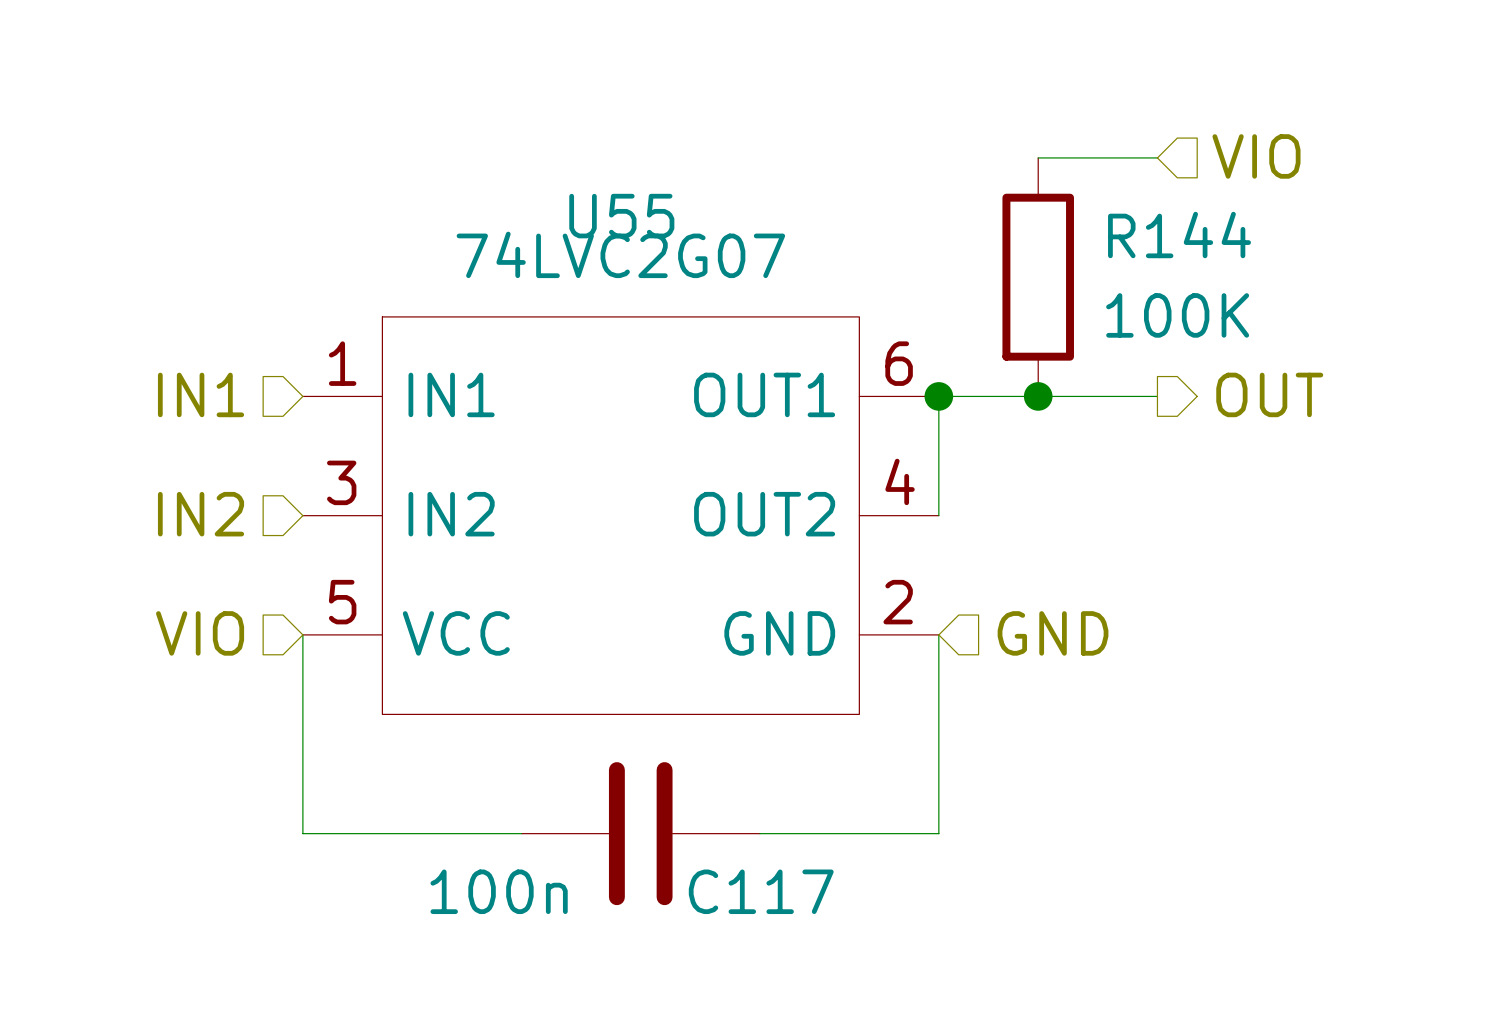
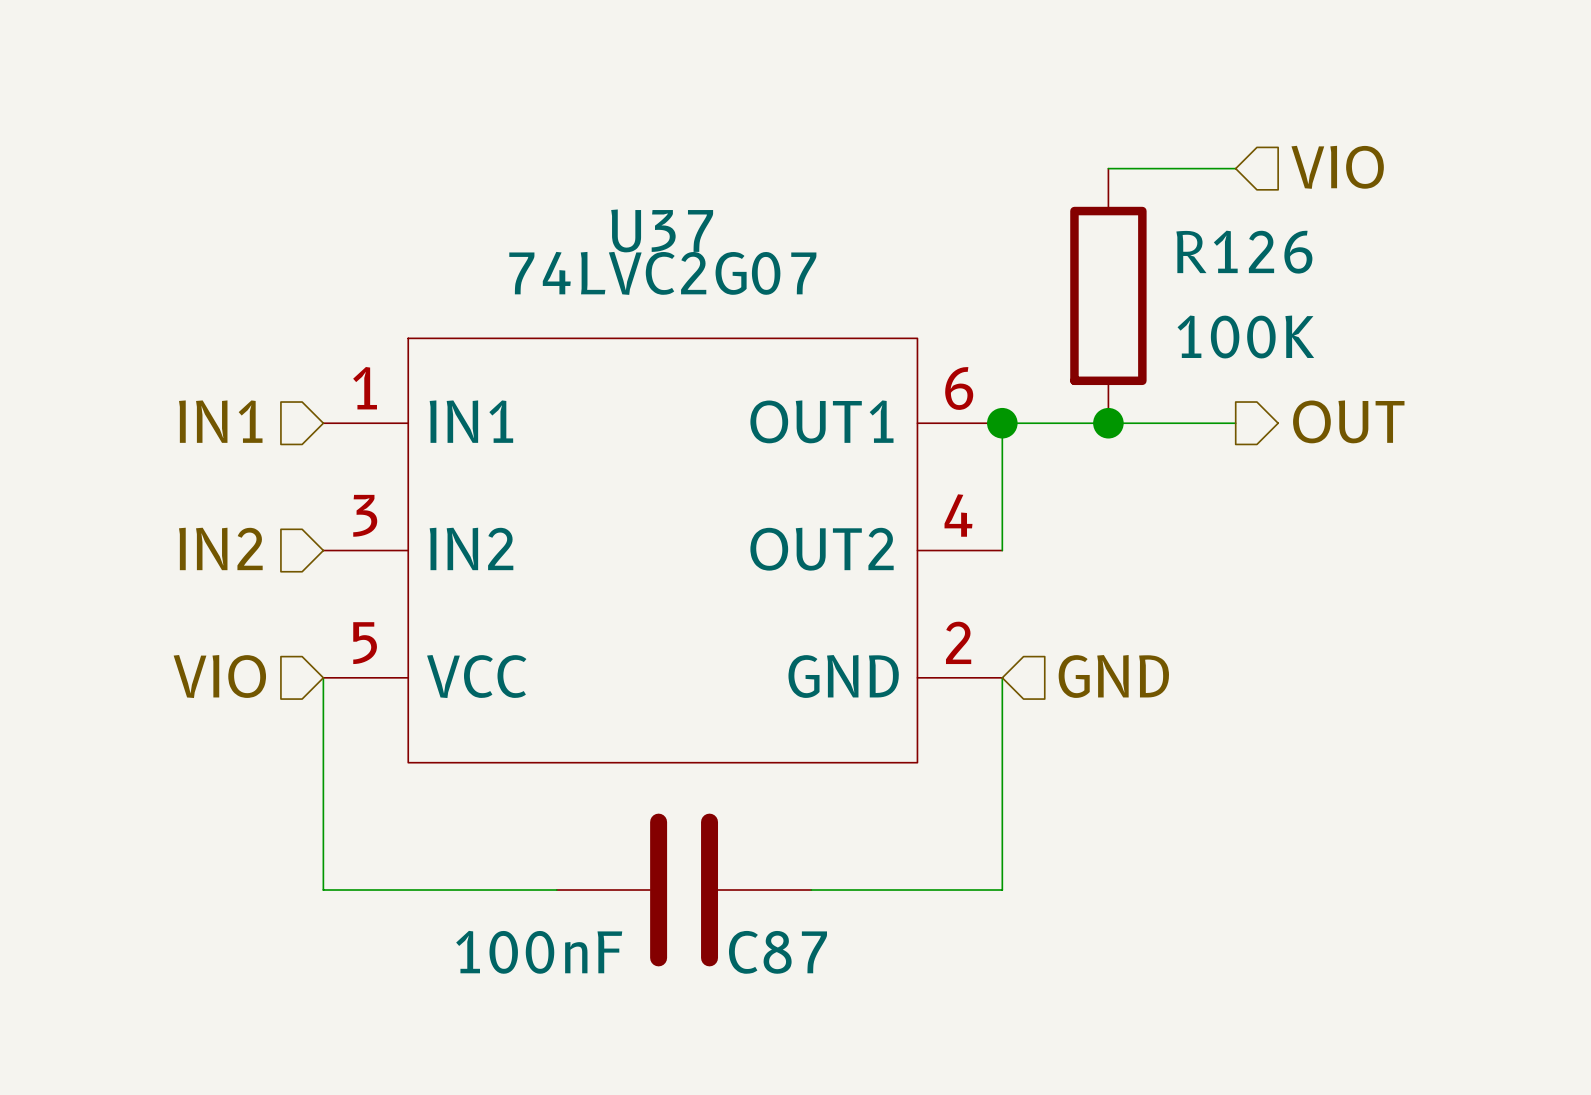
U55 name: U55 (621, 216) -> U37 (662, 230)
R144 name: R144 (1179, 235) -> R126 (1244, 252)
C117 value: 100n (499, 891) -> 100nF (539, 952)
C117 name: C117 (761, 891) -> C87 (777, 952)

